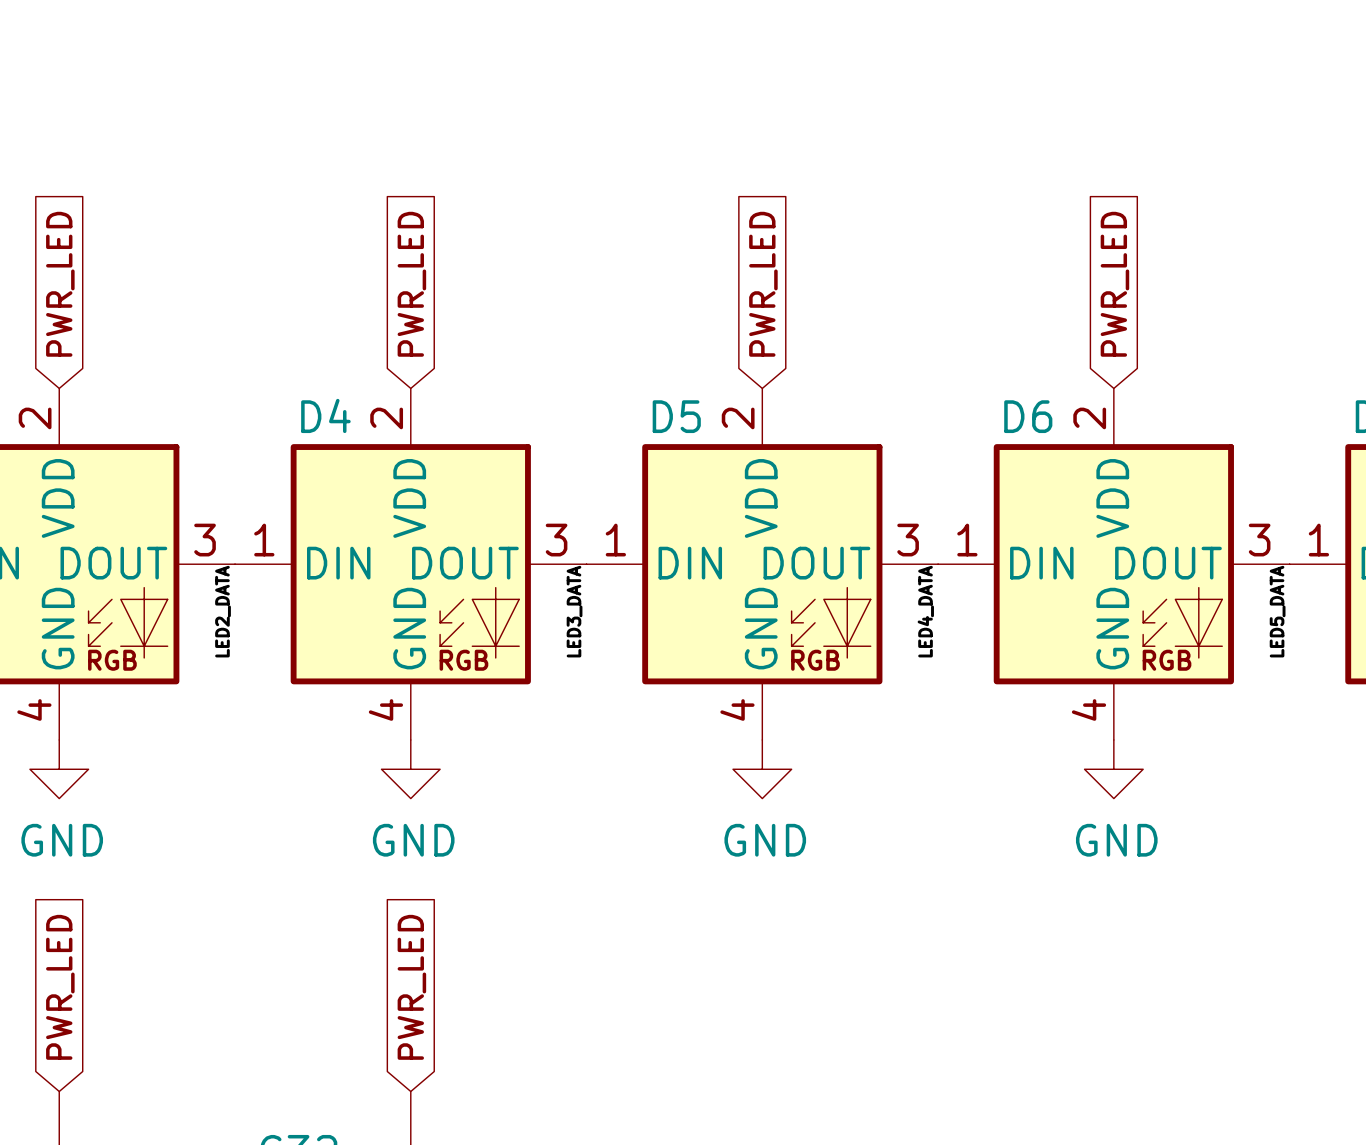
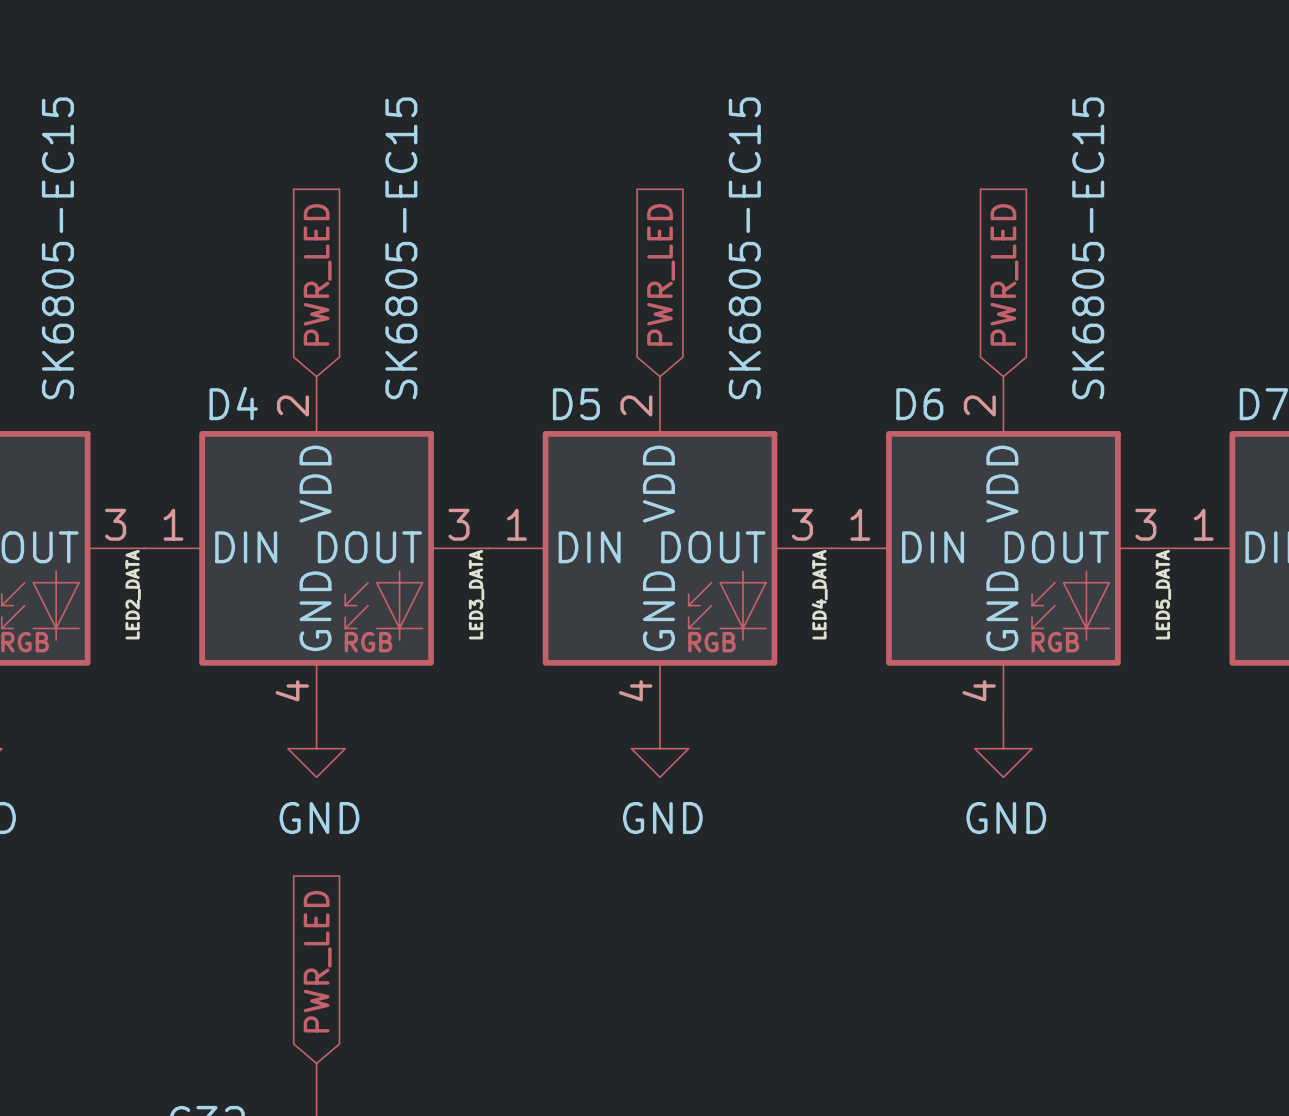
part value: none -> SK6805-EC15 (57, 248)
D4 value: none -> SK6805-EC15 (401, 248)
D5 value: none -> SK6805-EC15 (744, 248)
D6 value: none -> SK6805-EC15 (1088, 248)

